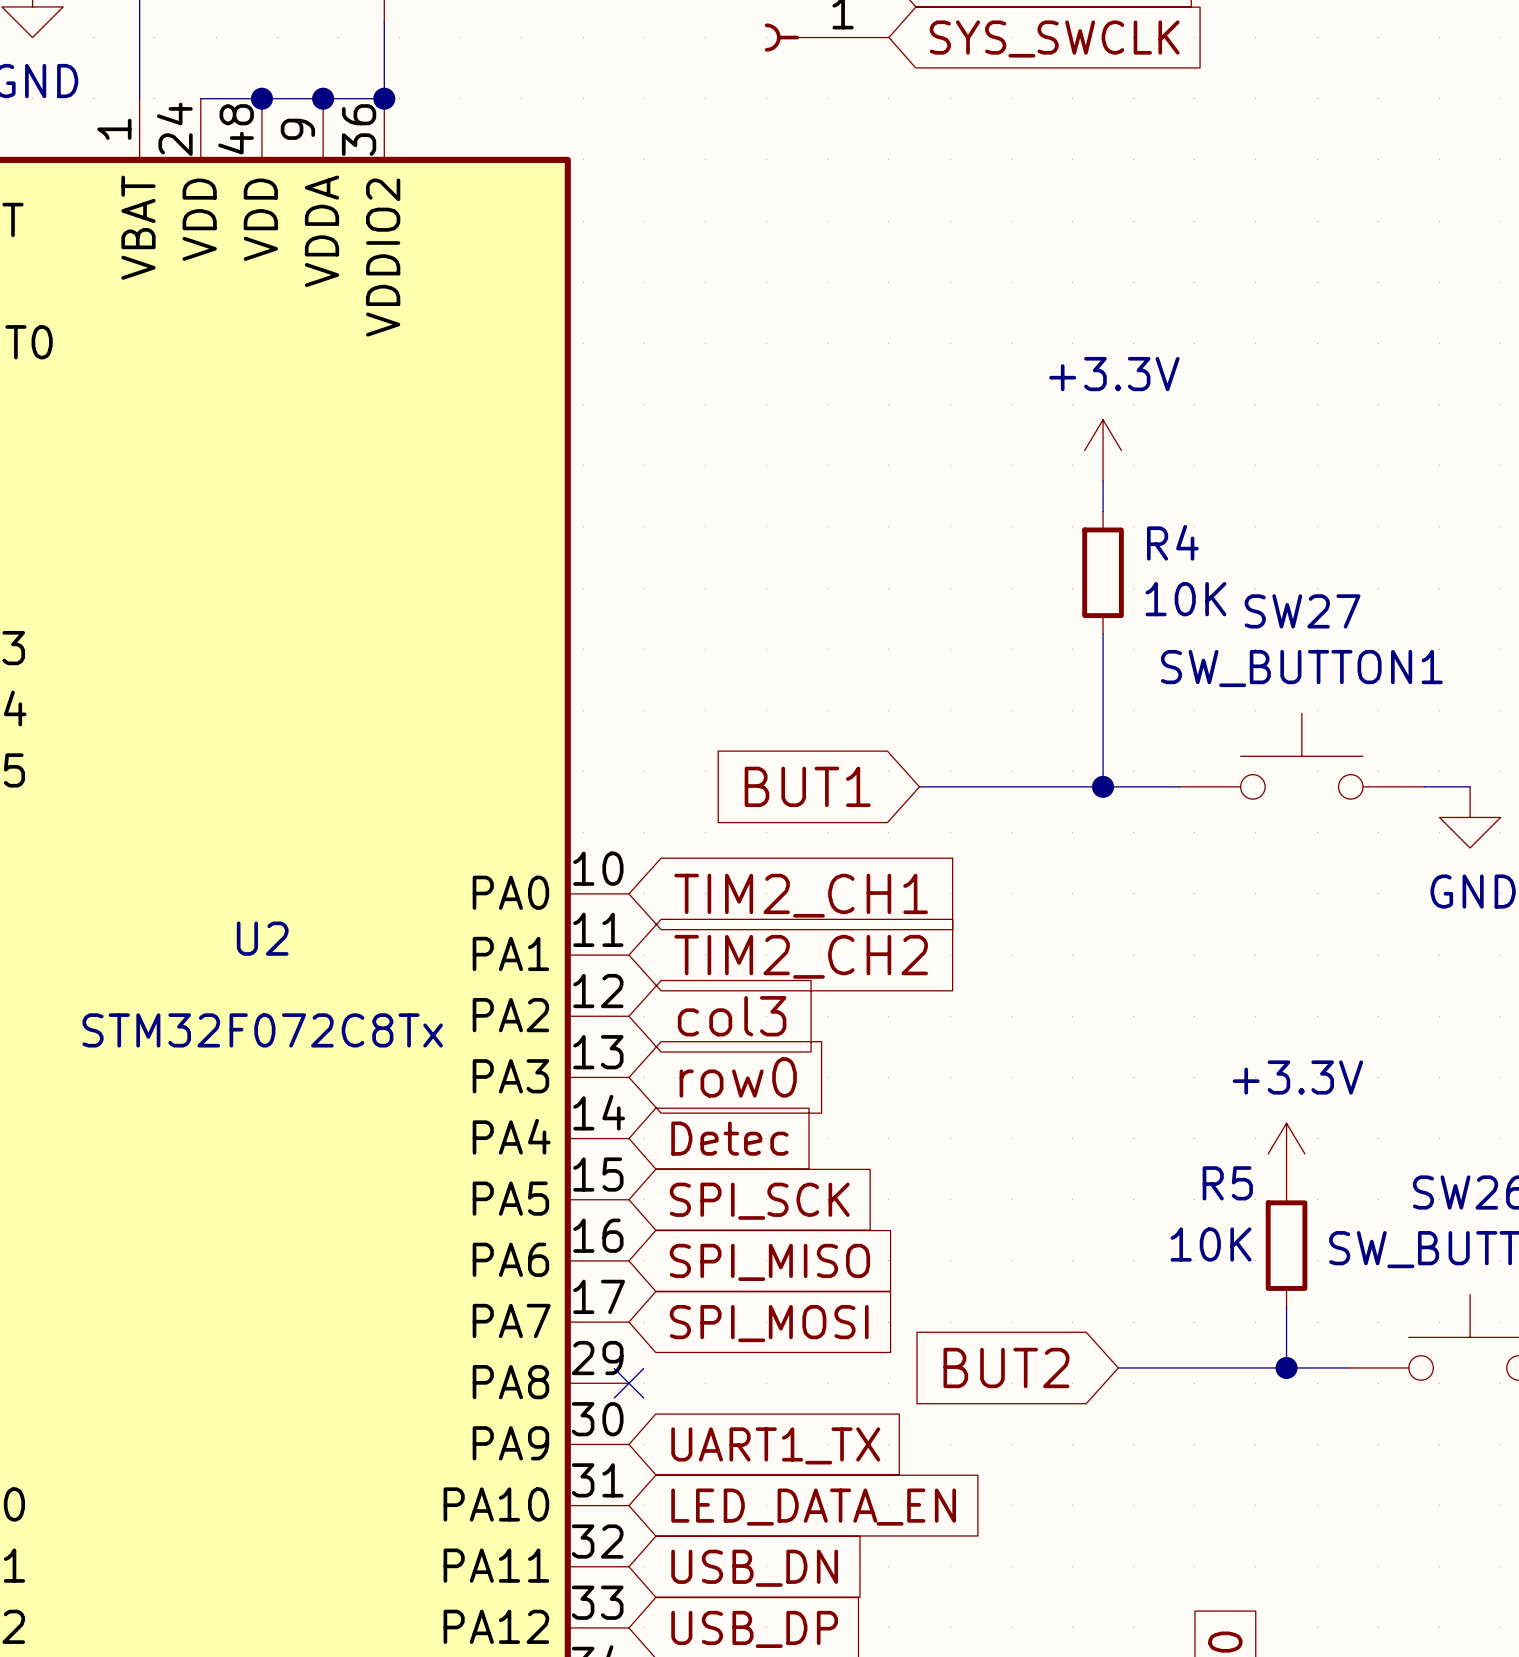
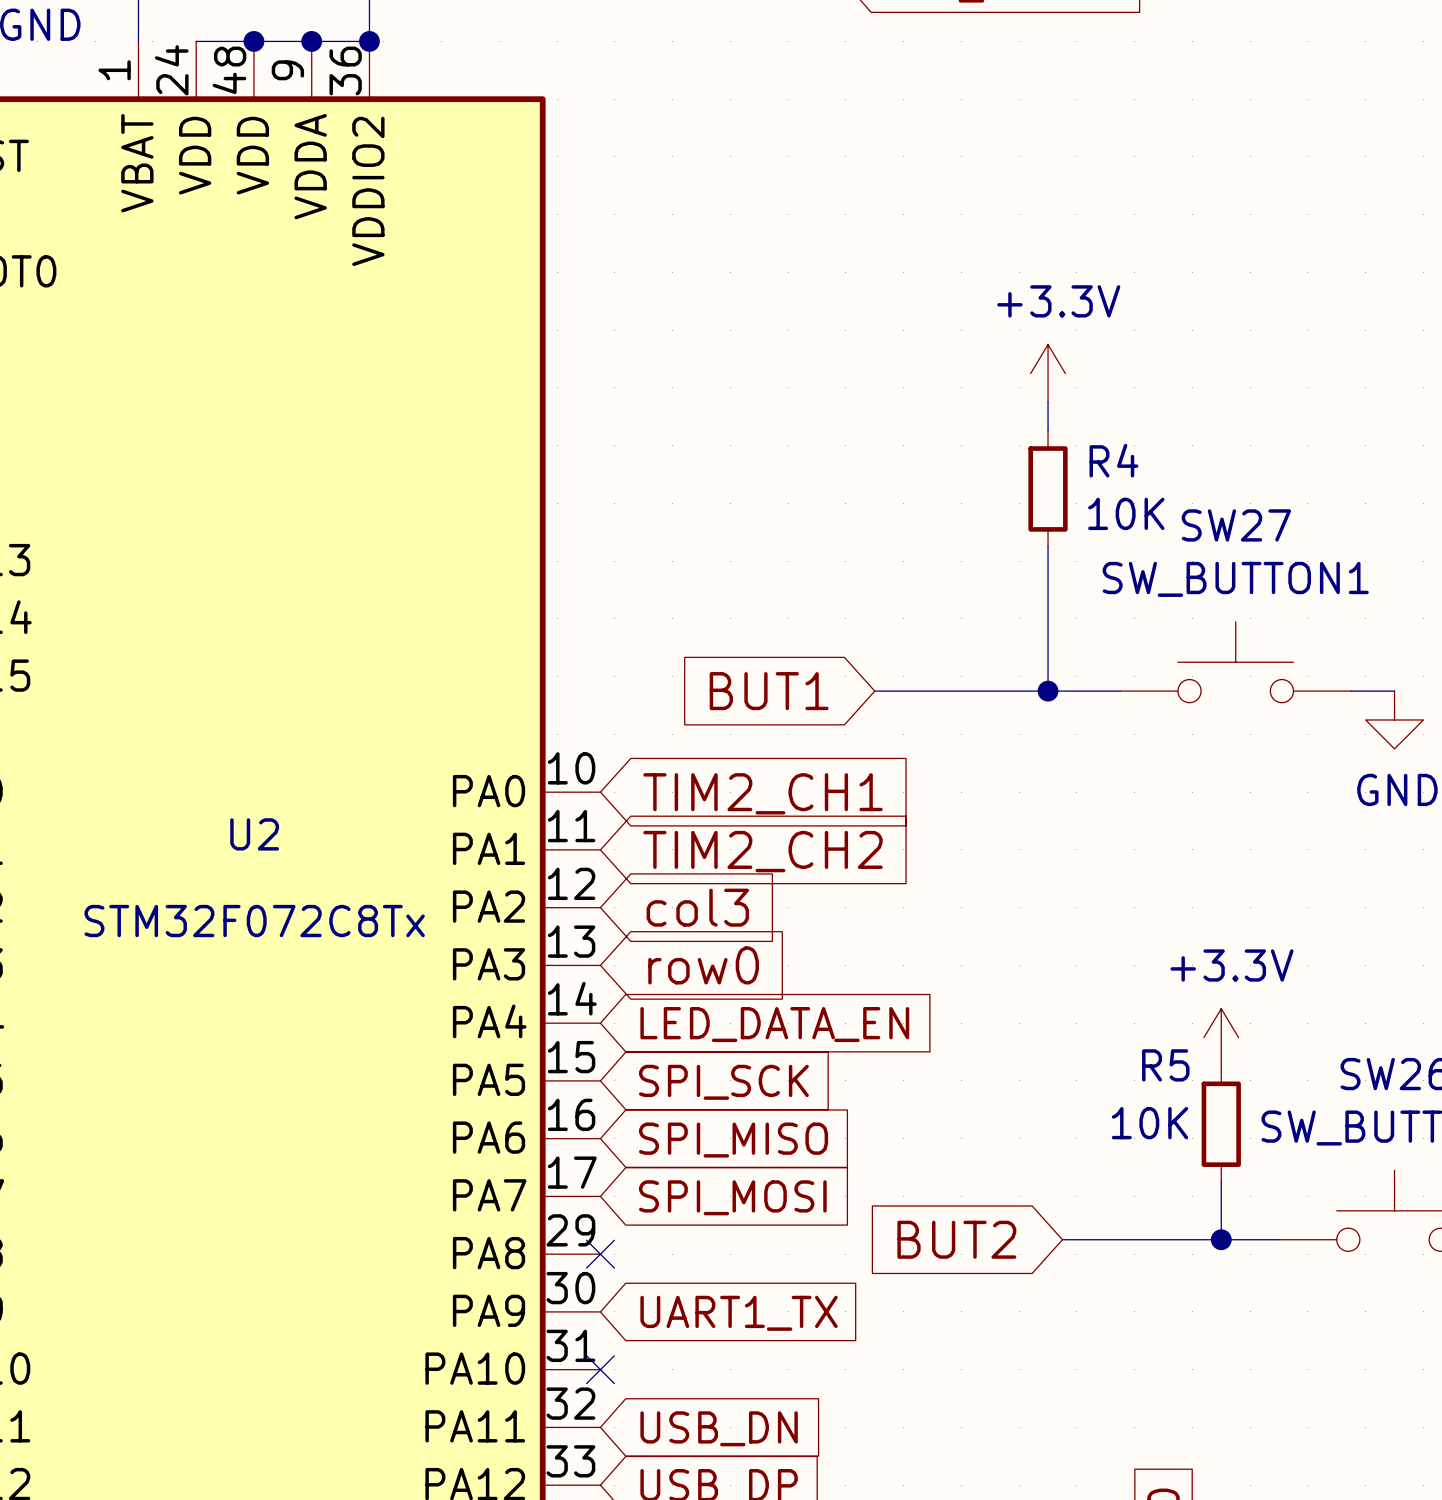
global label: Detec (729, 1138) -> LED_DATA_EN (774, 1024)
no-connect mark: none -> (600, 1369)
global label: LED_DATA_EN (813, 1507) -> none

